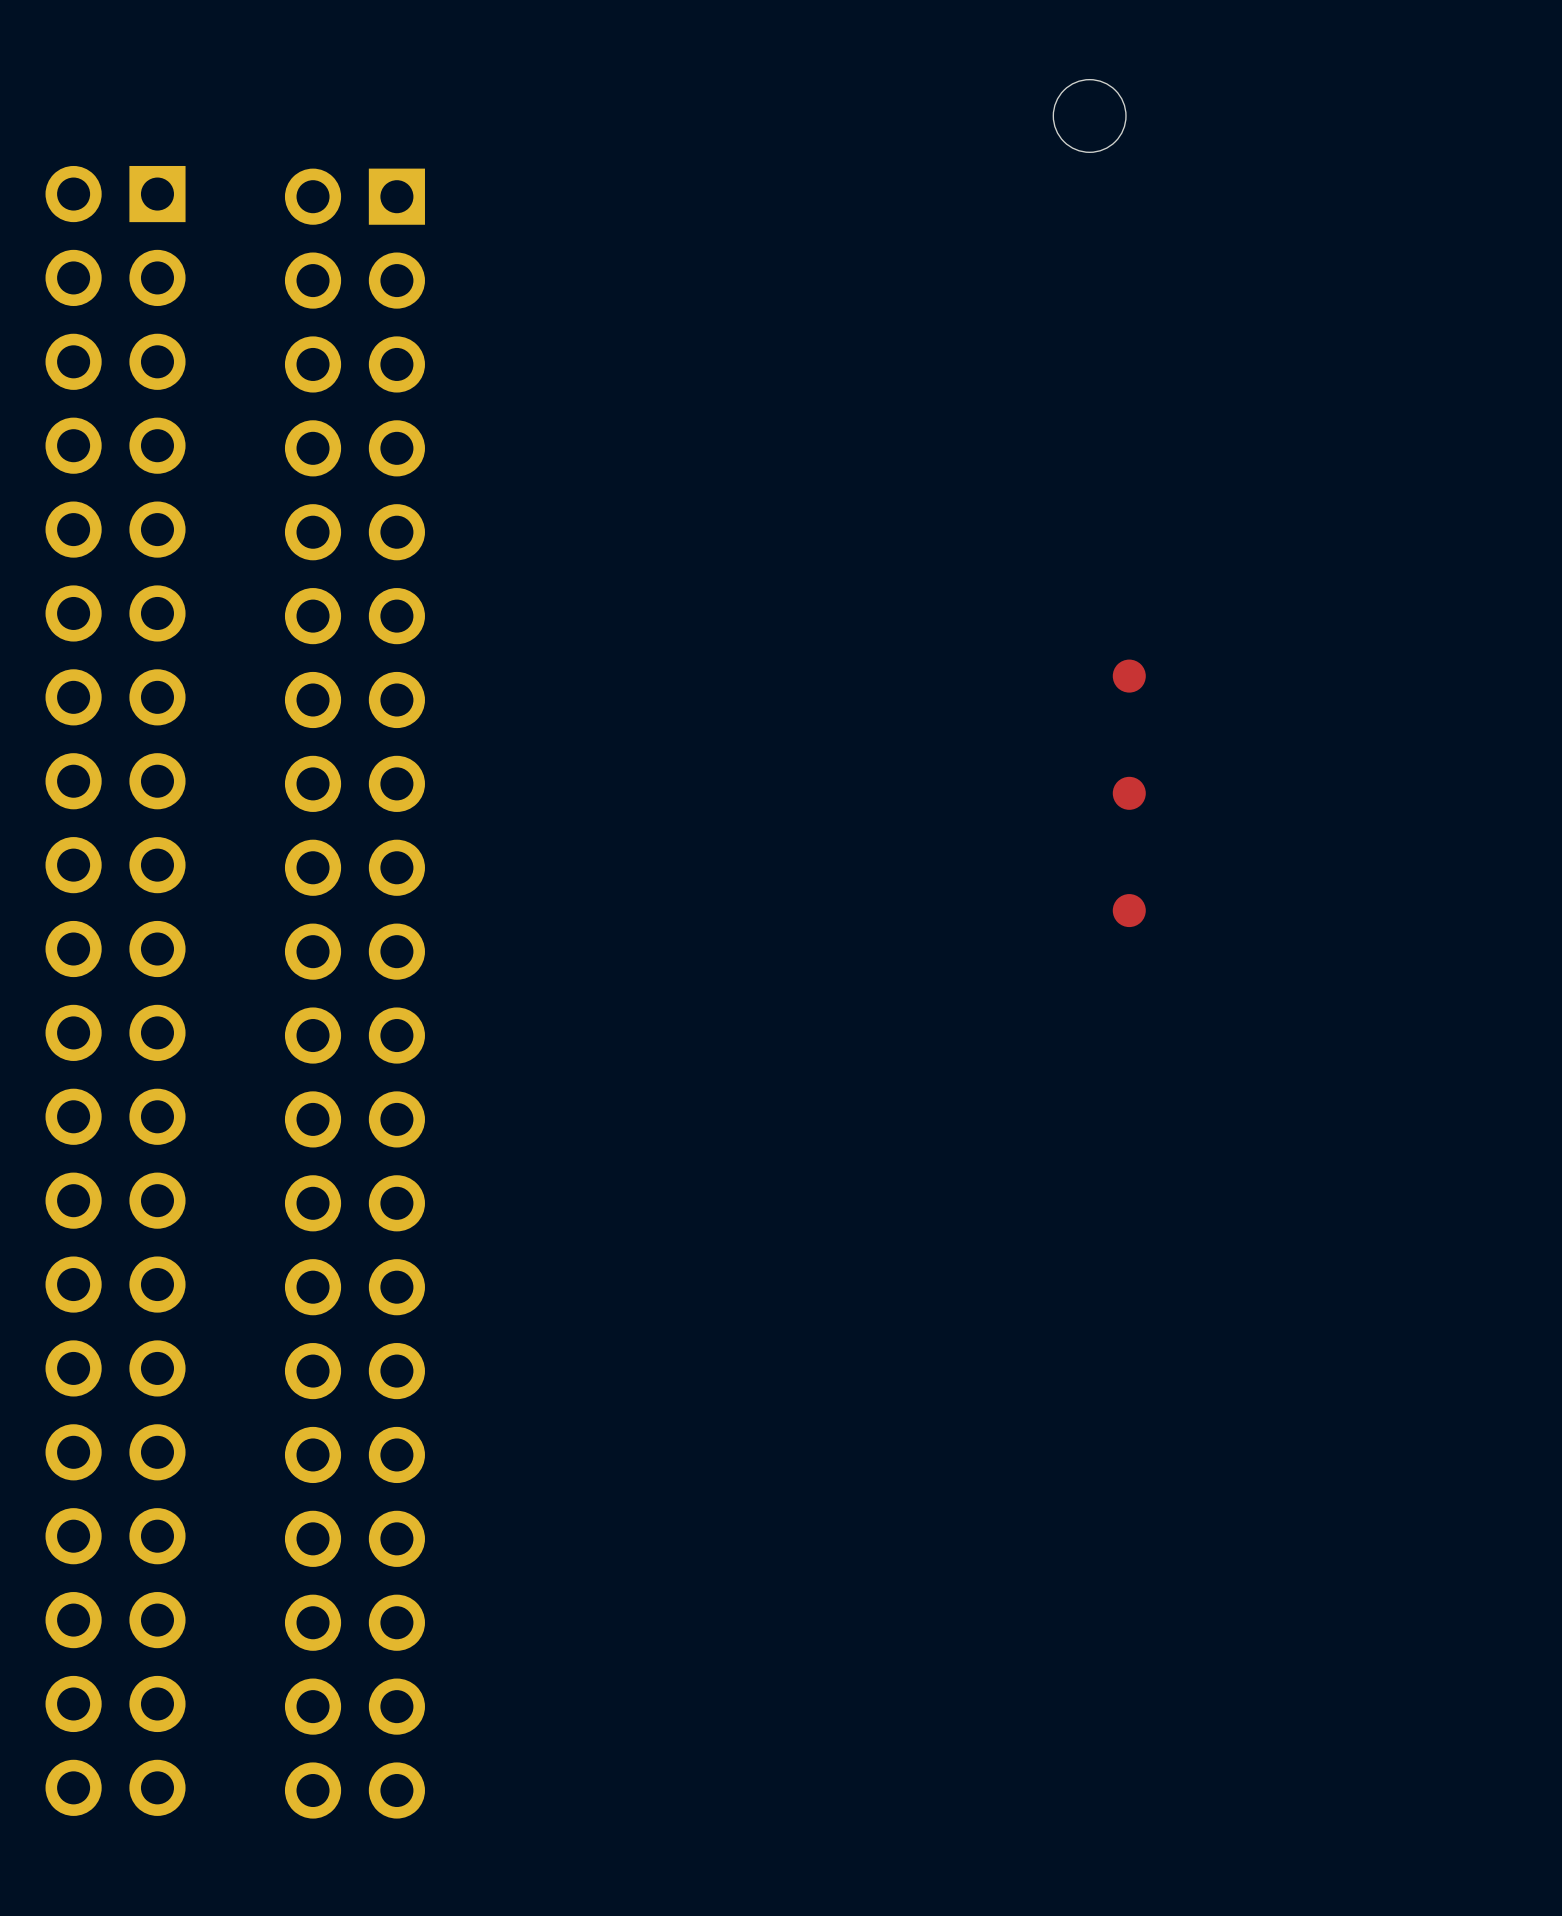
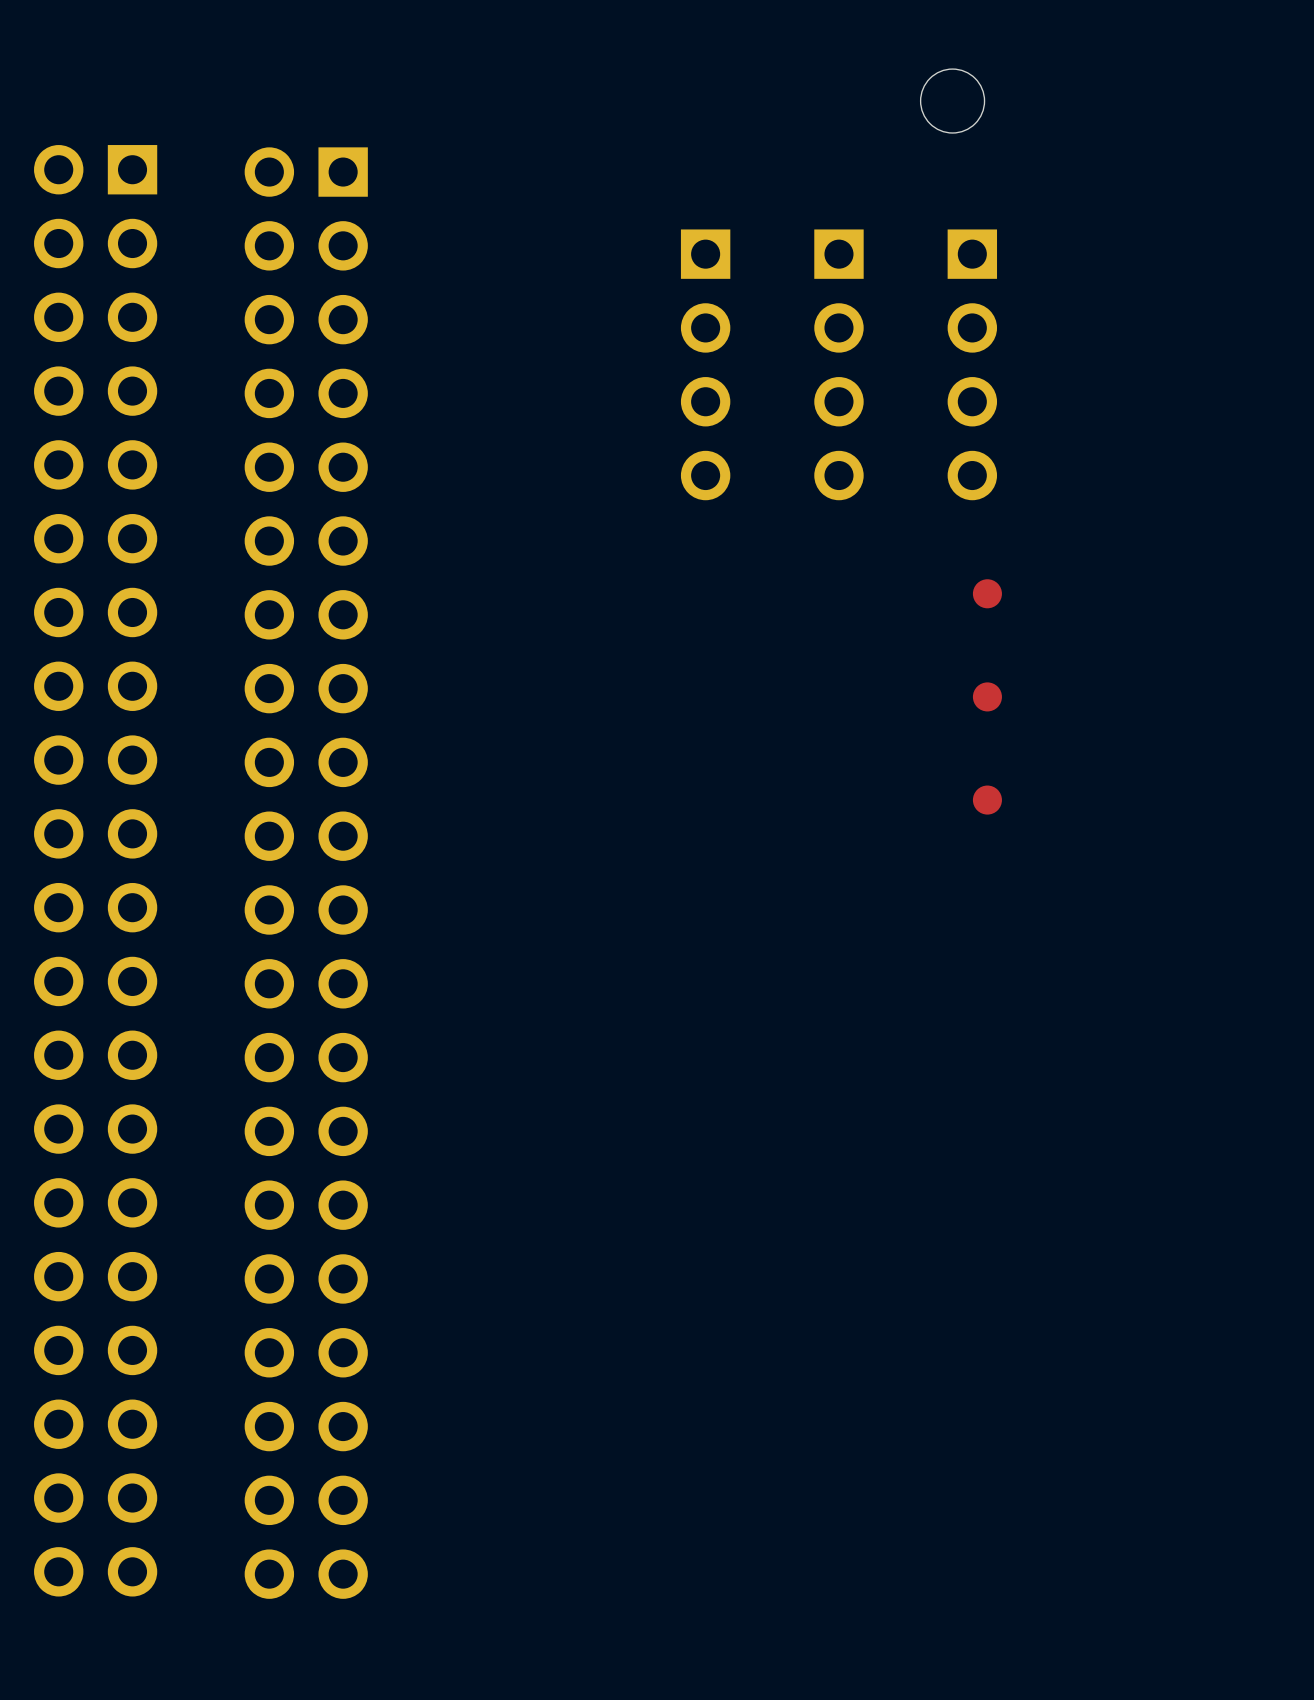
part: none -> (705, 364)
part: none -> (838, 364)
part: none -> (972, 364)

